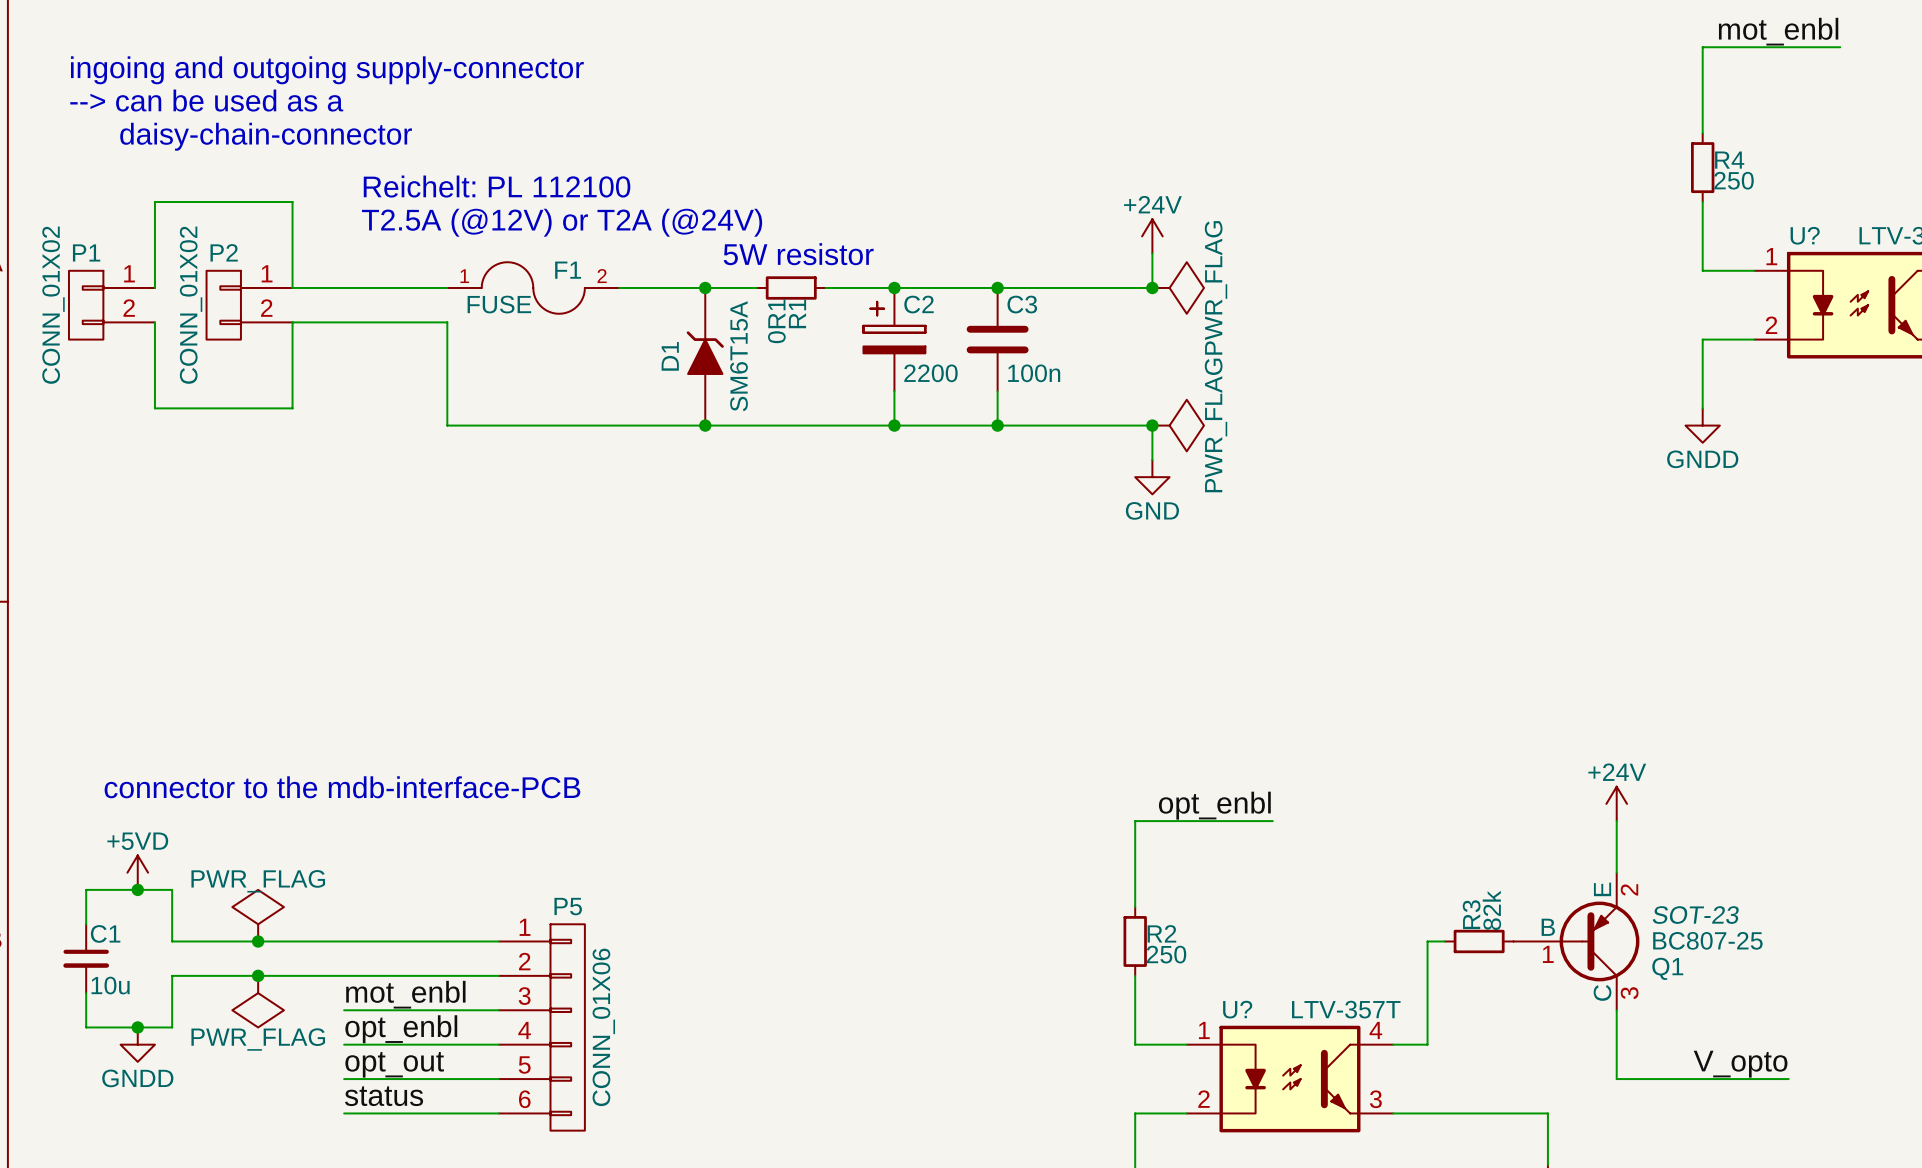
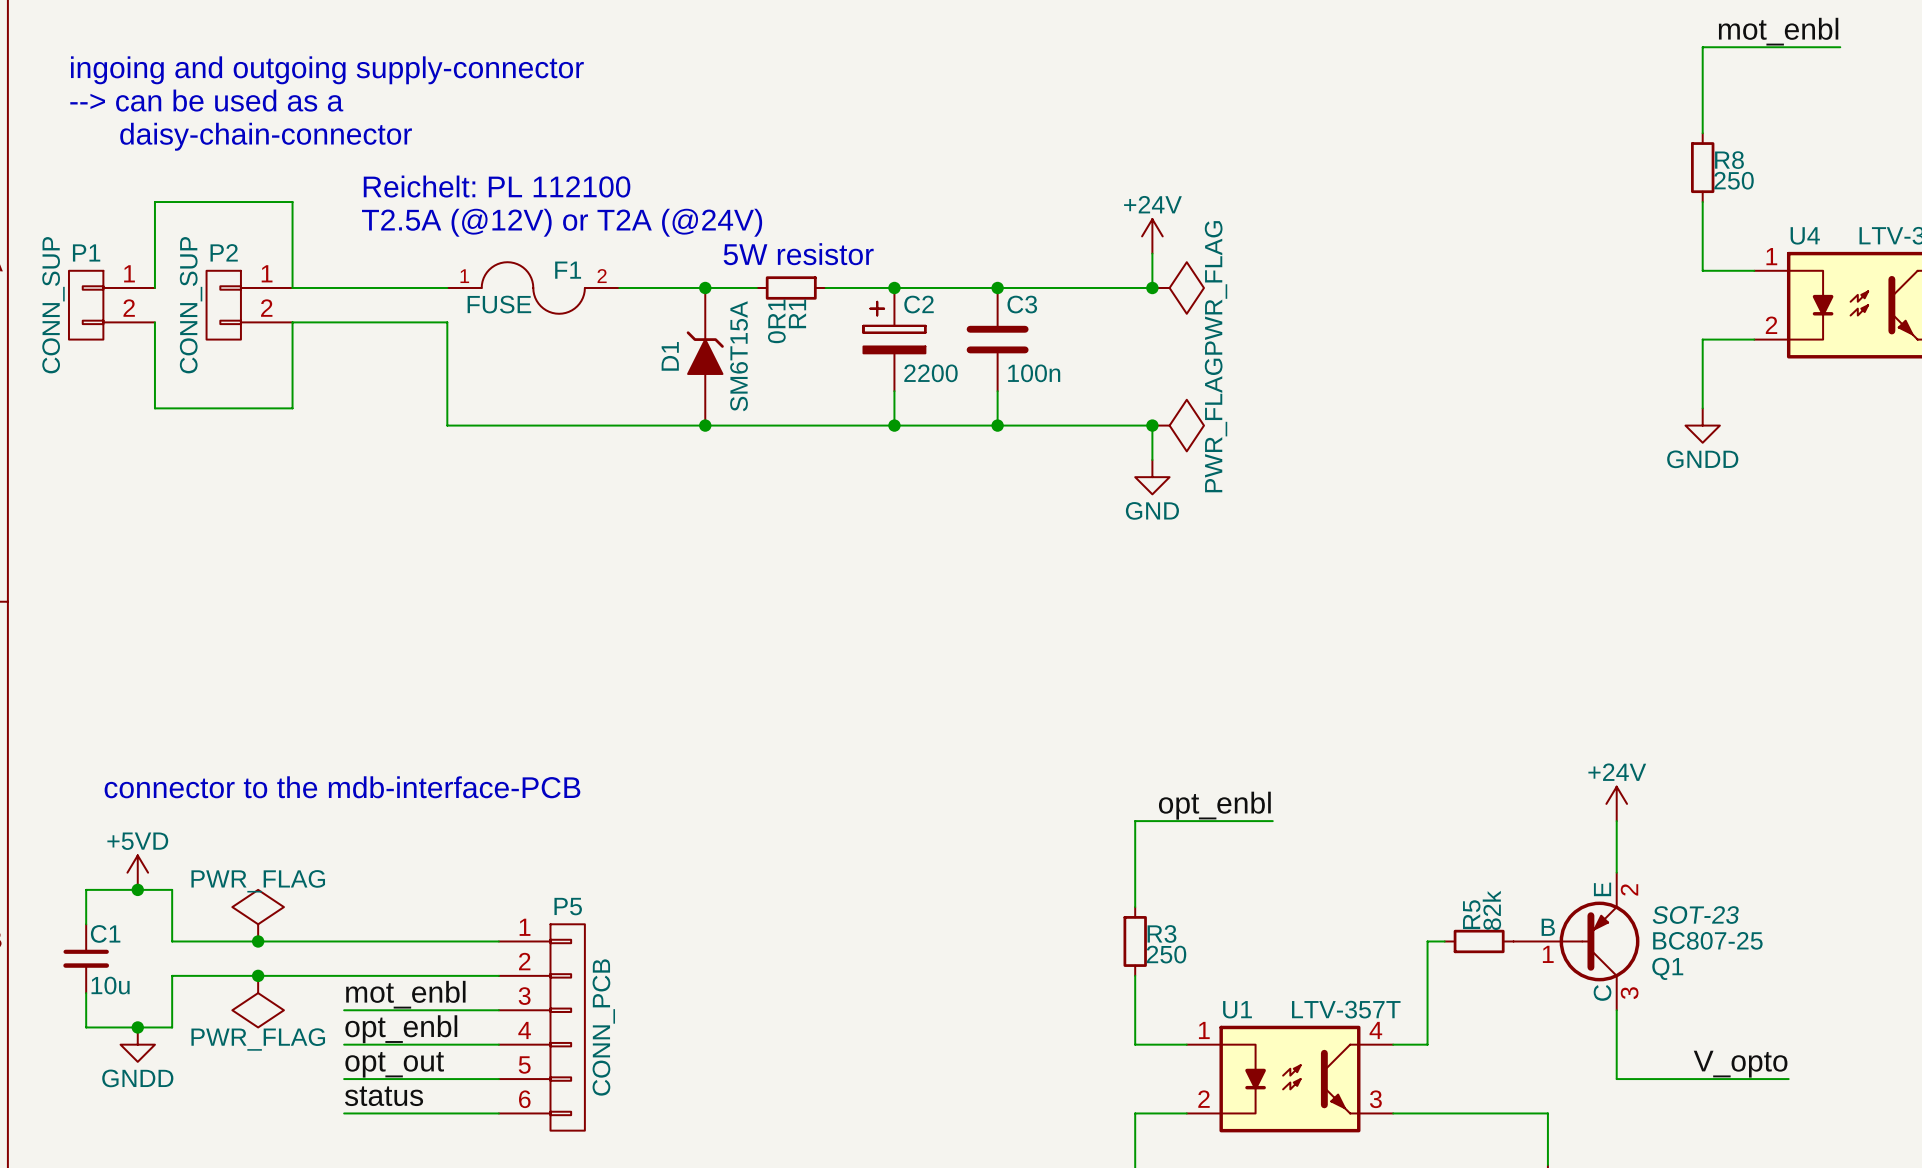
R4 name: R4 (1729, 160) -> R8 (1729, 160)
U? name: U? (1805, 235) -> U4 (1805, 235)
P1 value: CONN_01X02 (53, 305) -> CONN_SUP (53, 305)
P2 value: CONN_01X02 (191, 305) -> CONN_SUP (191, 305)
R3 name: R3 (1471, 914) -> R5 (1471, 914)
R2 name: R2 (1161, 933) -> R3 (1161, 933)
U? name: U? (1237, 1009) -> U1 (1237, 1009)
P5 value: CONN_01X06 (603, 1027) -> CONN_PCB (603, 1027)

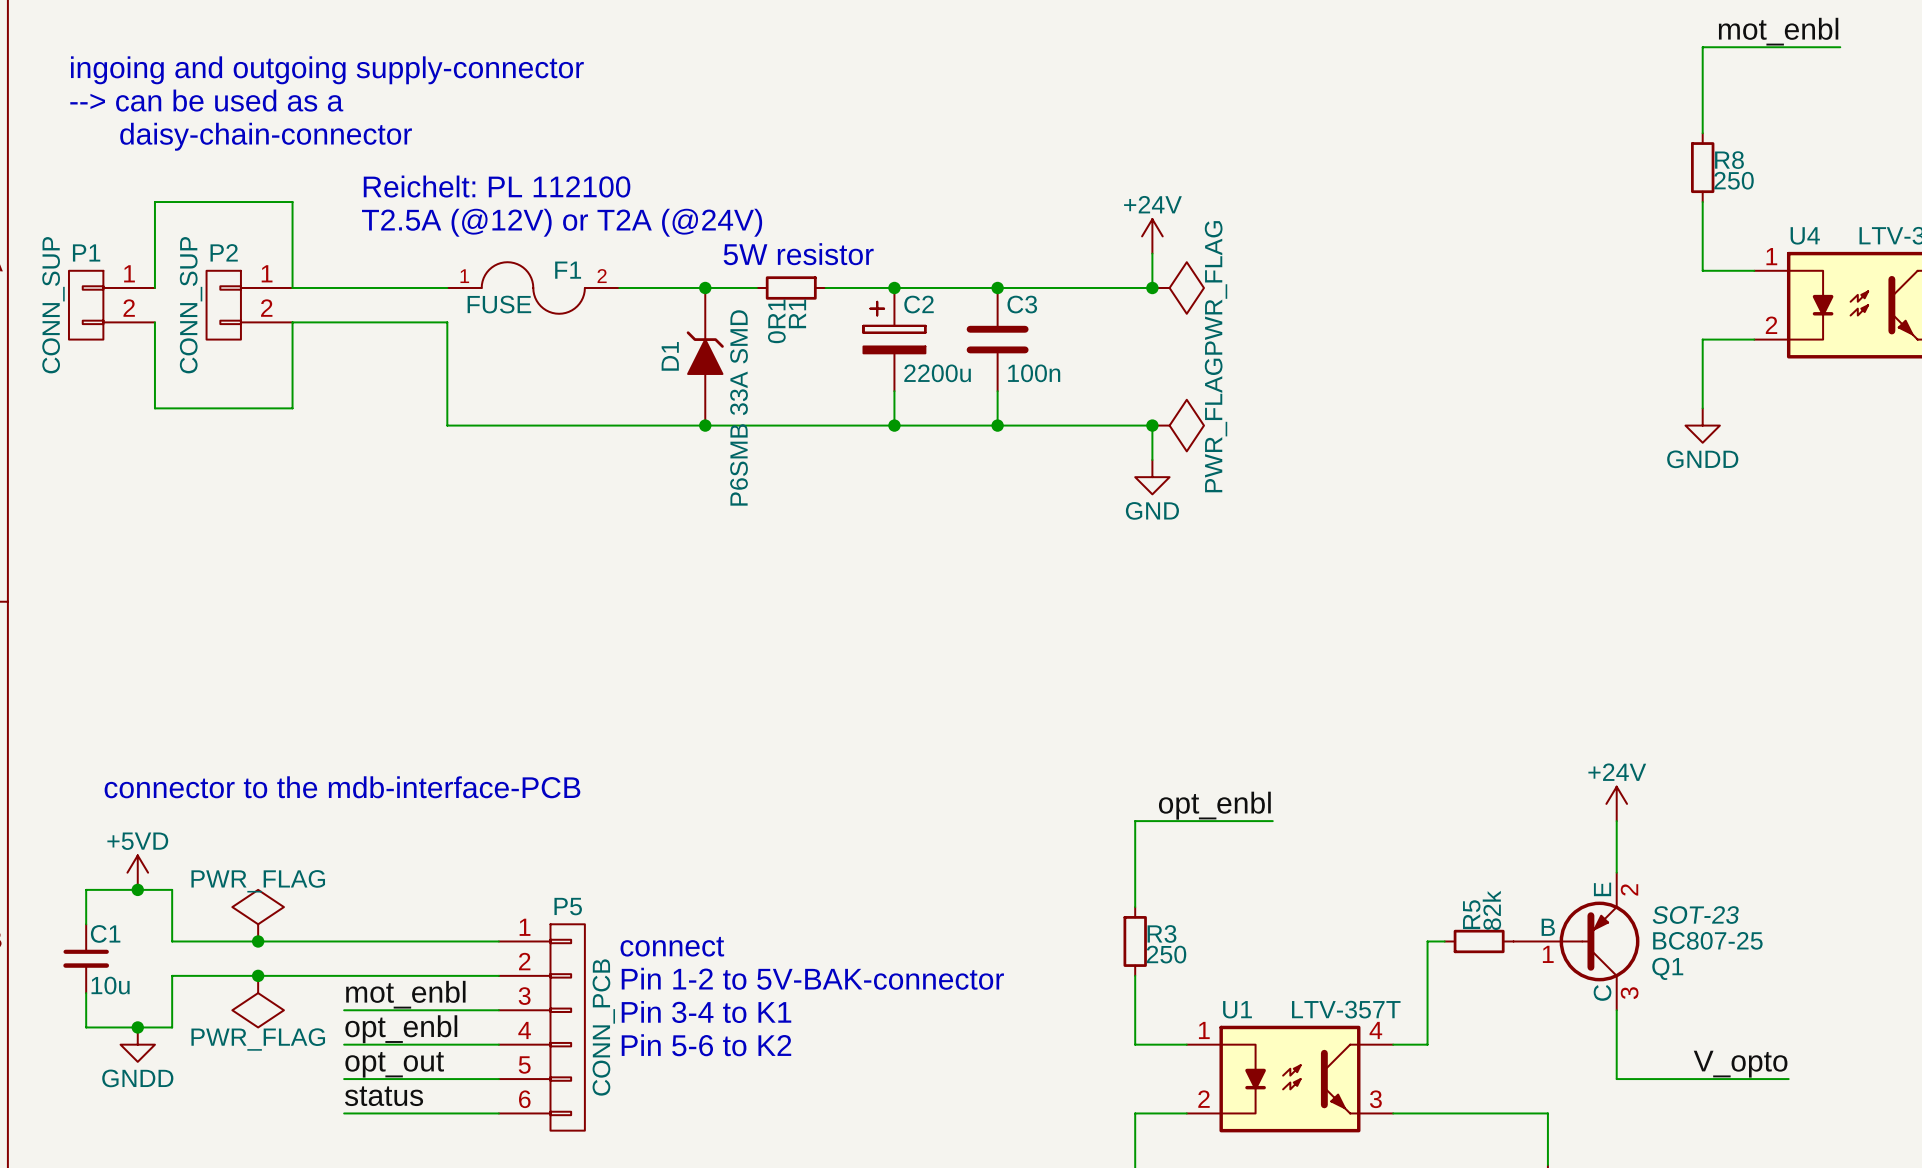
D1 value: SM6T15A (739, 356) -> P6SMB 33A SMD (739, 407)
C2 value: 2200 (930, 373) -> 2200u (937, 373)
text: none -> connect (672, 946)
text: none -> Pin 1-2 to 5V-BAK-connector (812, 978)
text: none -> Pin 3-4 to K1 (706, 1012)
text: none -> Pin 5-6 to K2 (706, 1045)

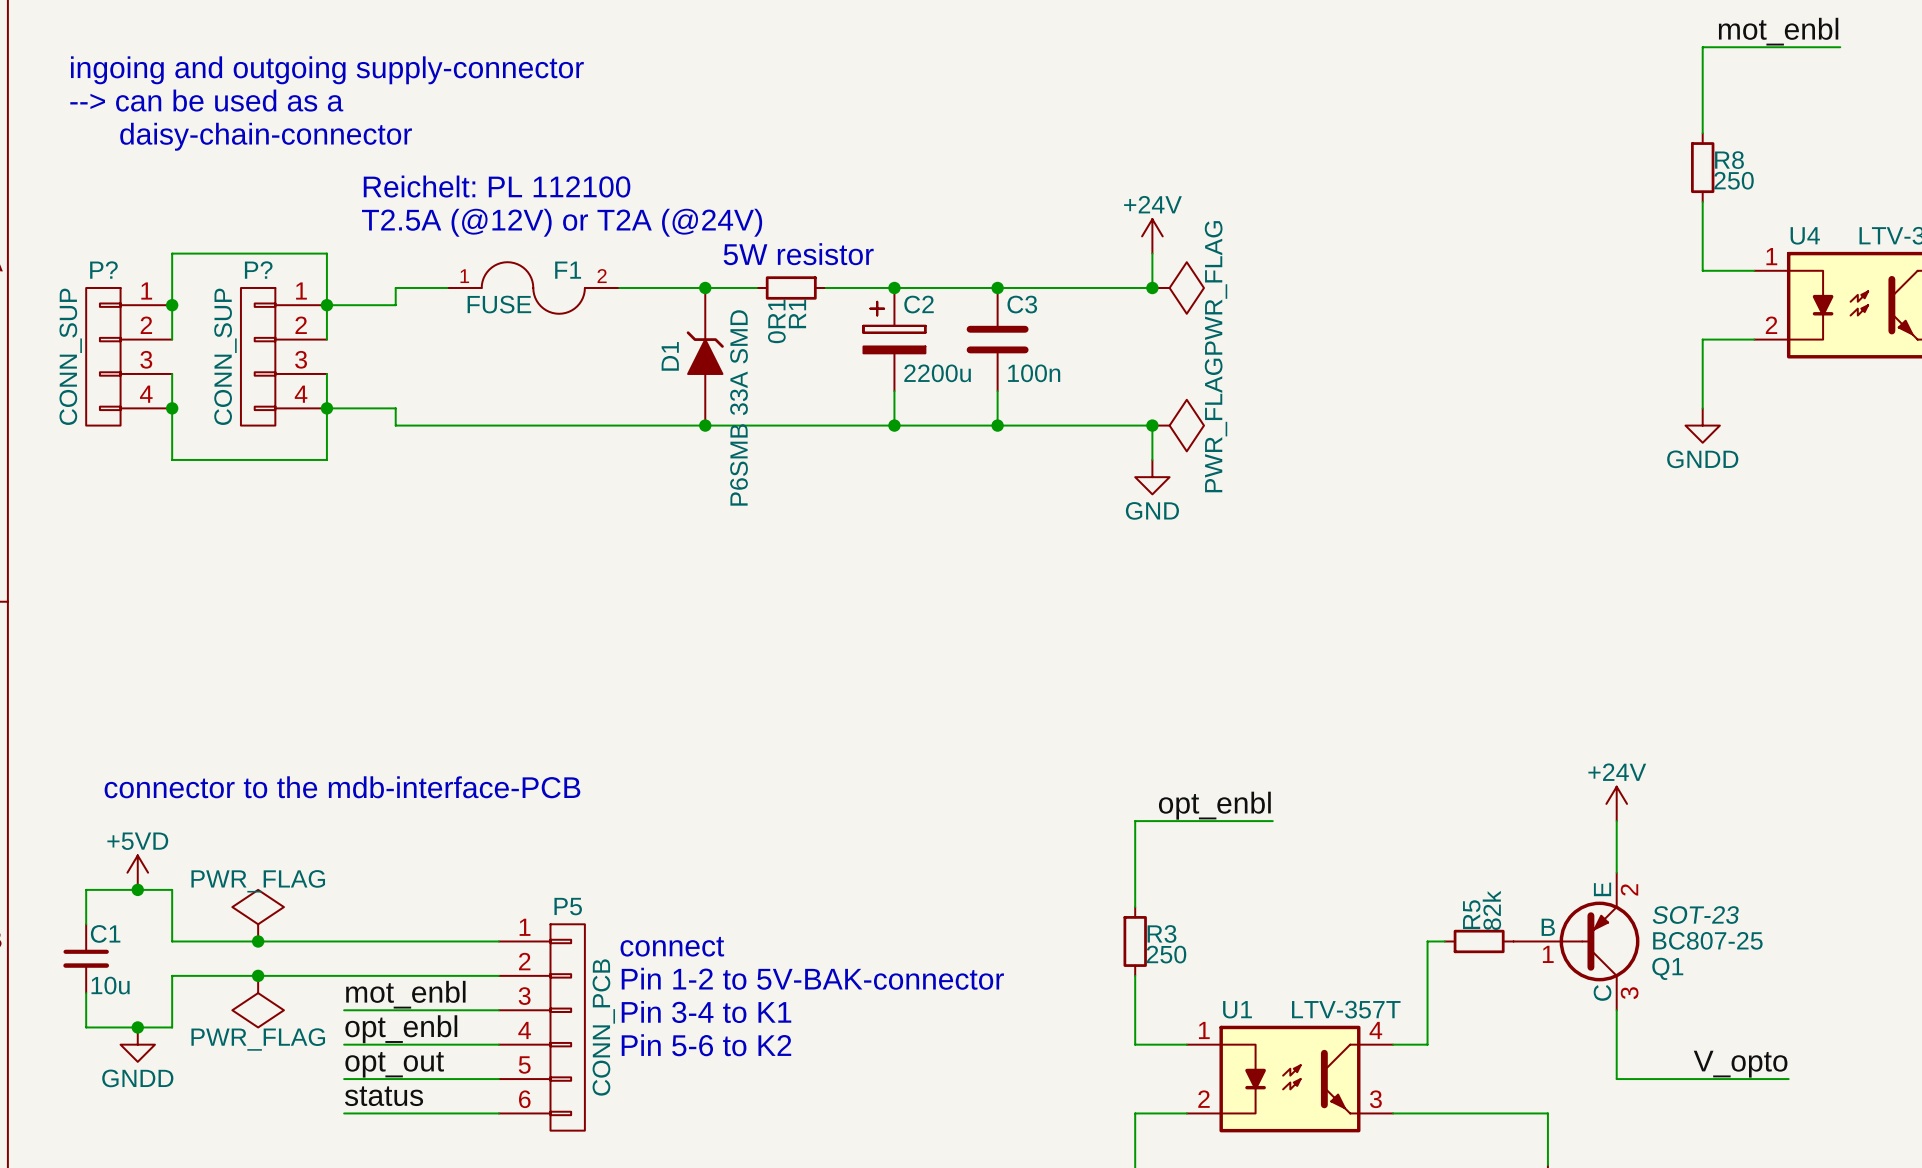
wire: (154, 287) (154, 202) (292, 202) (292, 287) (395, 287) -> (326, 305) (395, 305) (395, 287)
P1: CONN_SUP (111, 305) -> none
junction: none -> (172, 305)
P2: CONN_SUP (249, 305) -> none
junction: none -> (326, 305)
wire: (154, 322) (154, 408) (292, 408) (292, 322) (447, 322) (447, 425) -> (326, 408) (395, 408) (395, 425) (447, 425)
wire: none -> (172, 339) (172, 253) (326, 253) (326, 339)
P?: none -> CONN_SUP (129, 356)
P?: none -> CONN_SUP (283, 356)
wire: none -> (172, 373) (172, 459) (326, 459) (326, 373)
junction: none -> (172, 408)
junction: none -> (326, 408)

